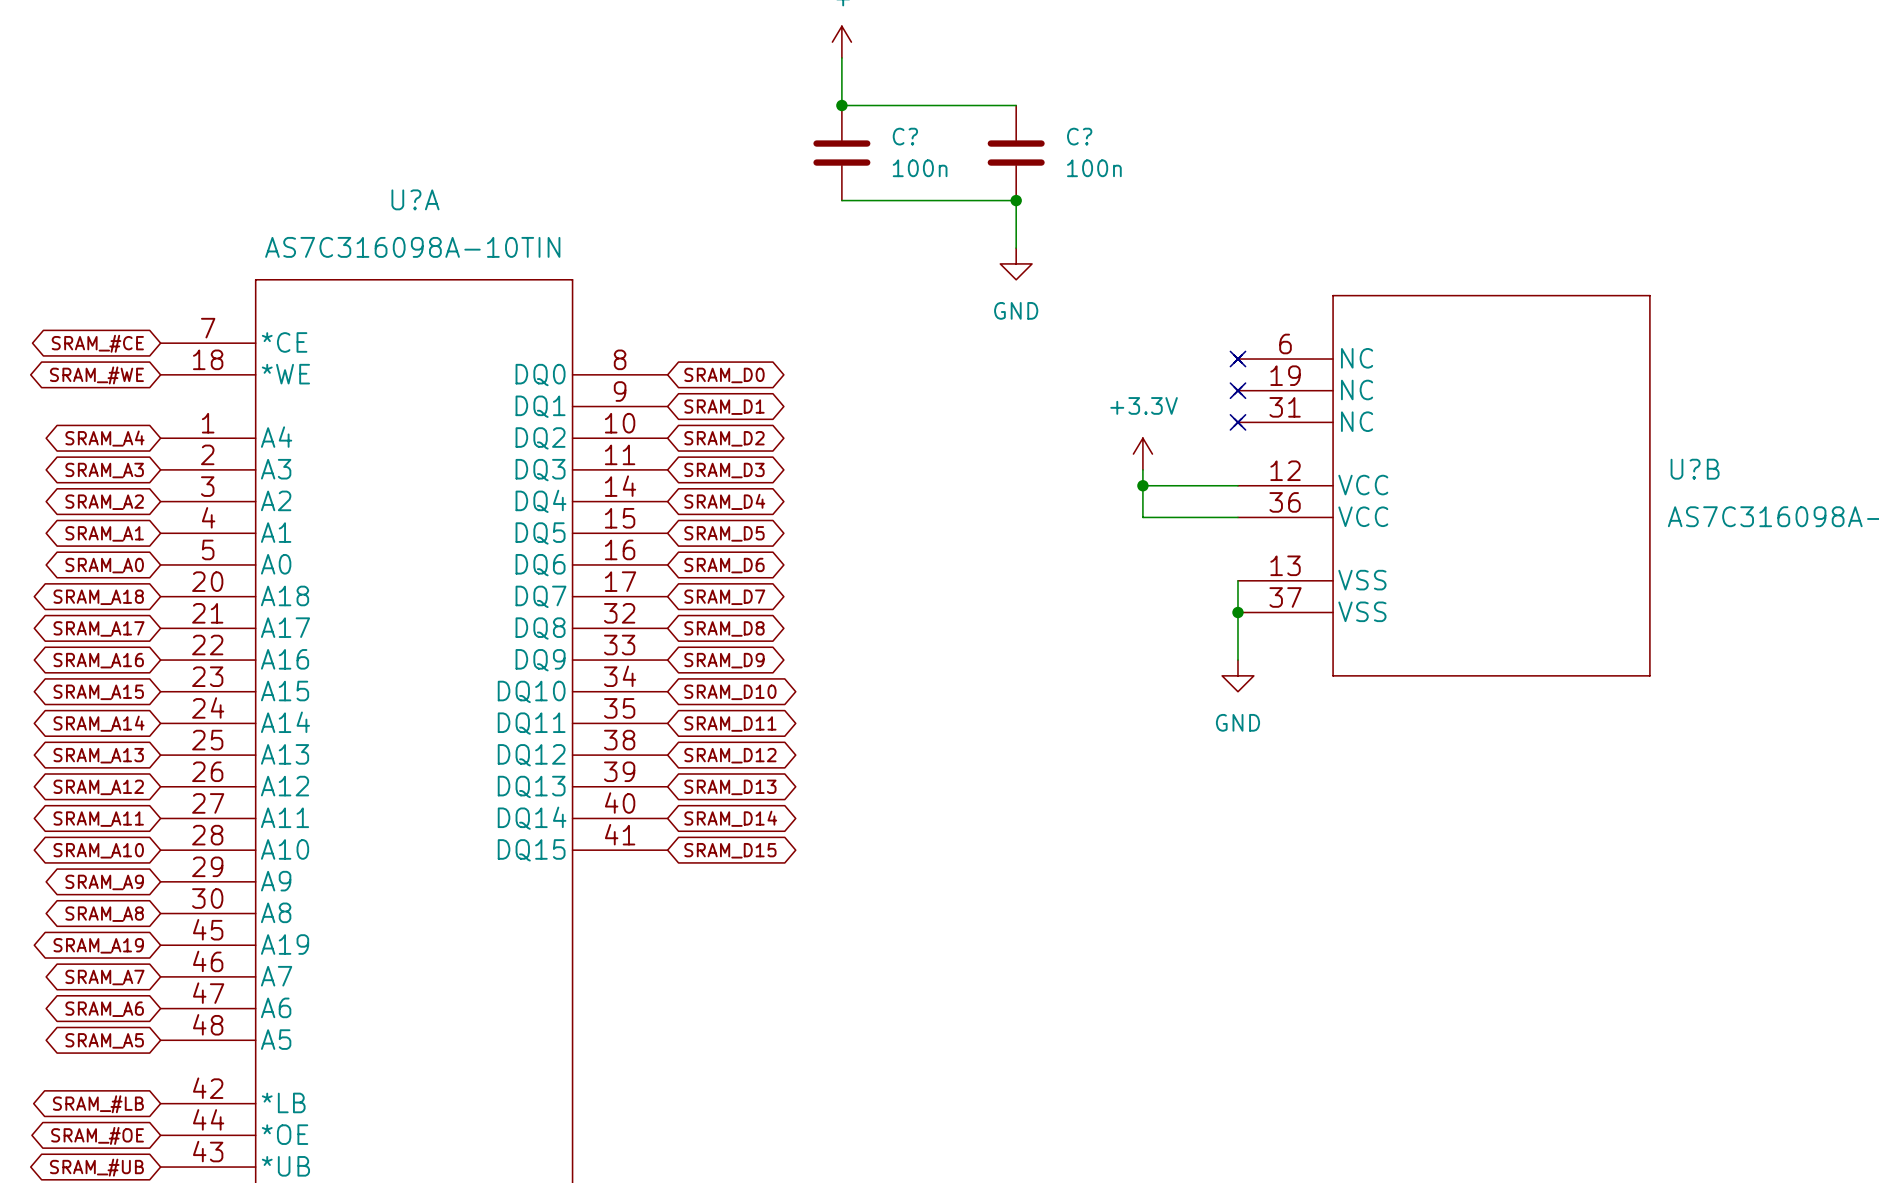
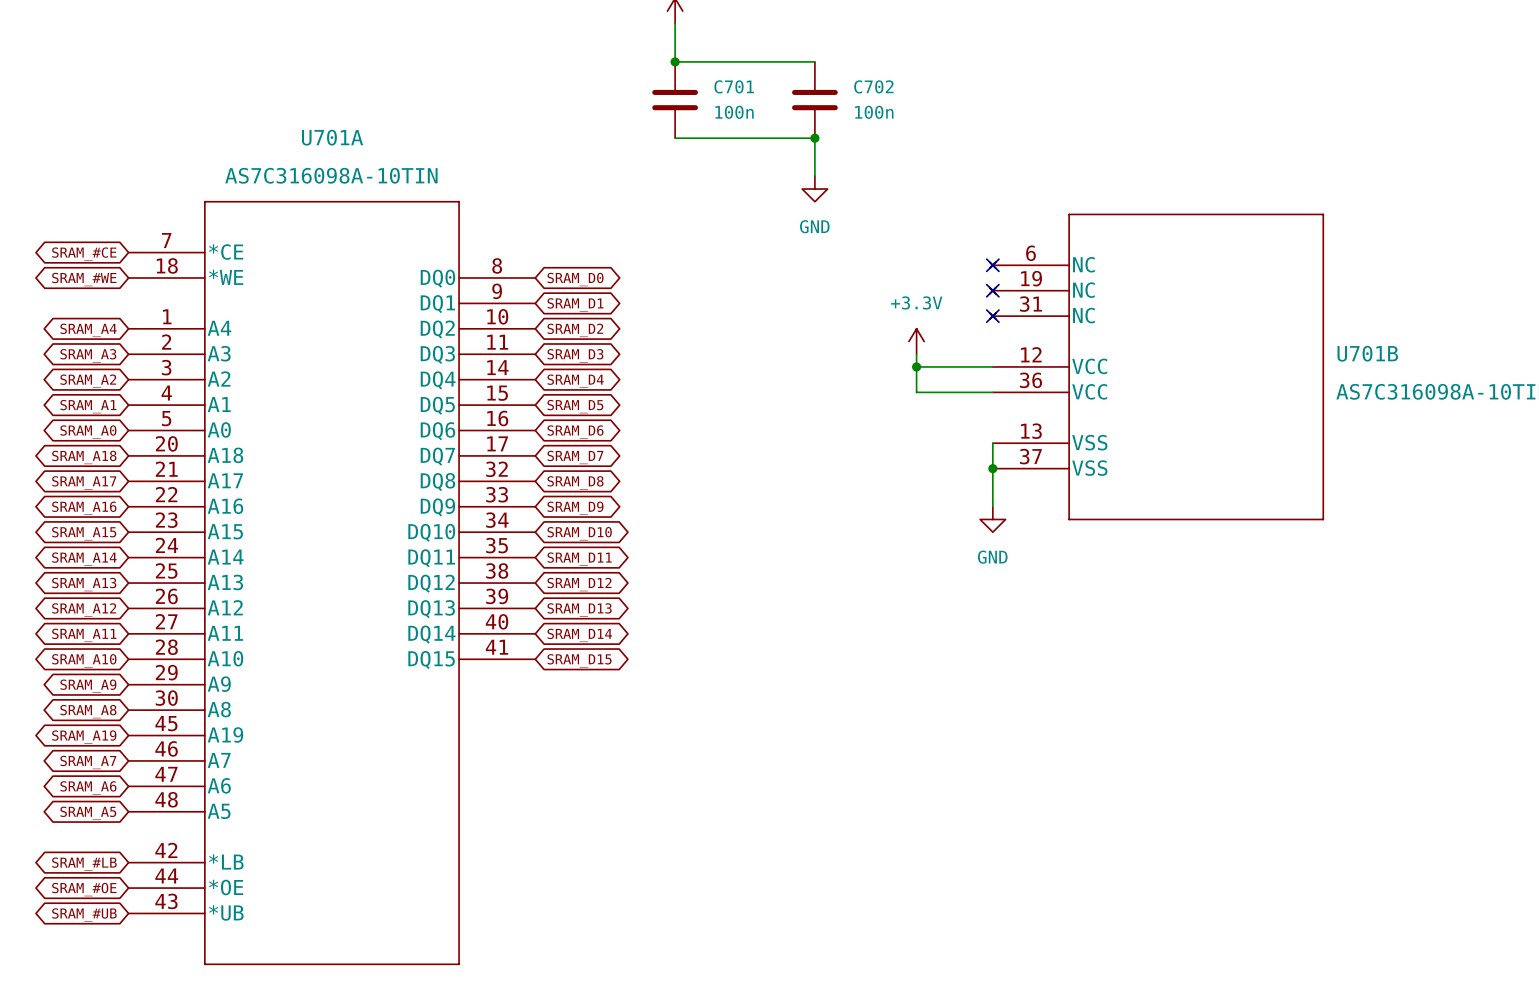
C? name: C? (905, 136) -> C701 (734, 86)
C? name: C? (1079, 136) -> C702 (873, 86)
U?A name: U?A (415, 199) -> U701A (332, 137)
U?B name: U?B (1695, 469) -> U701B (1367, 353)

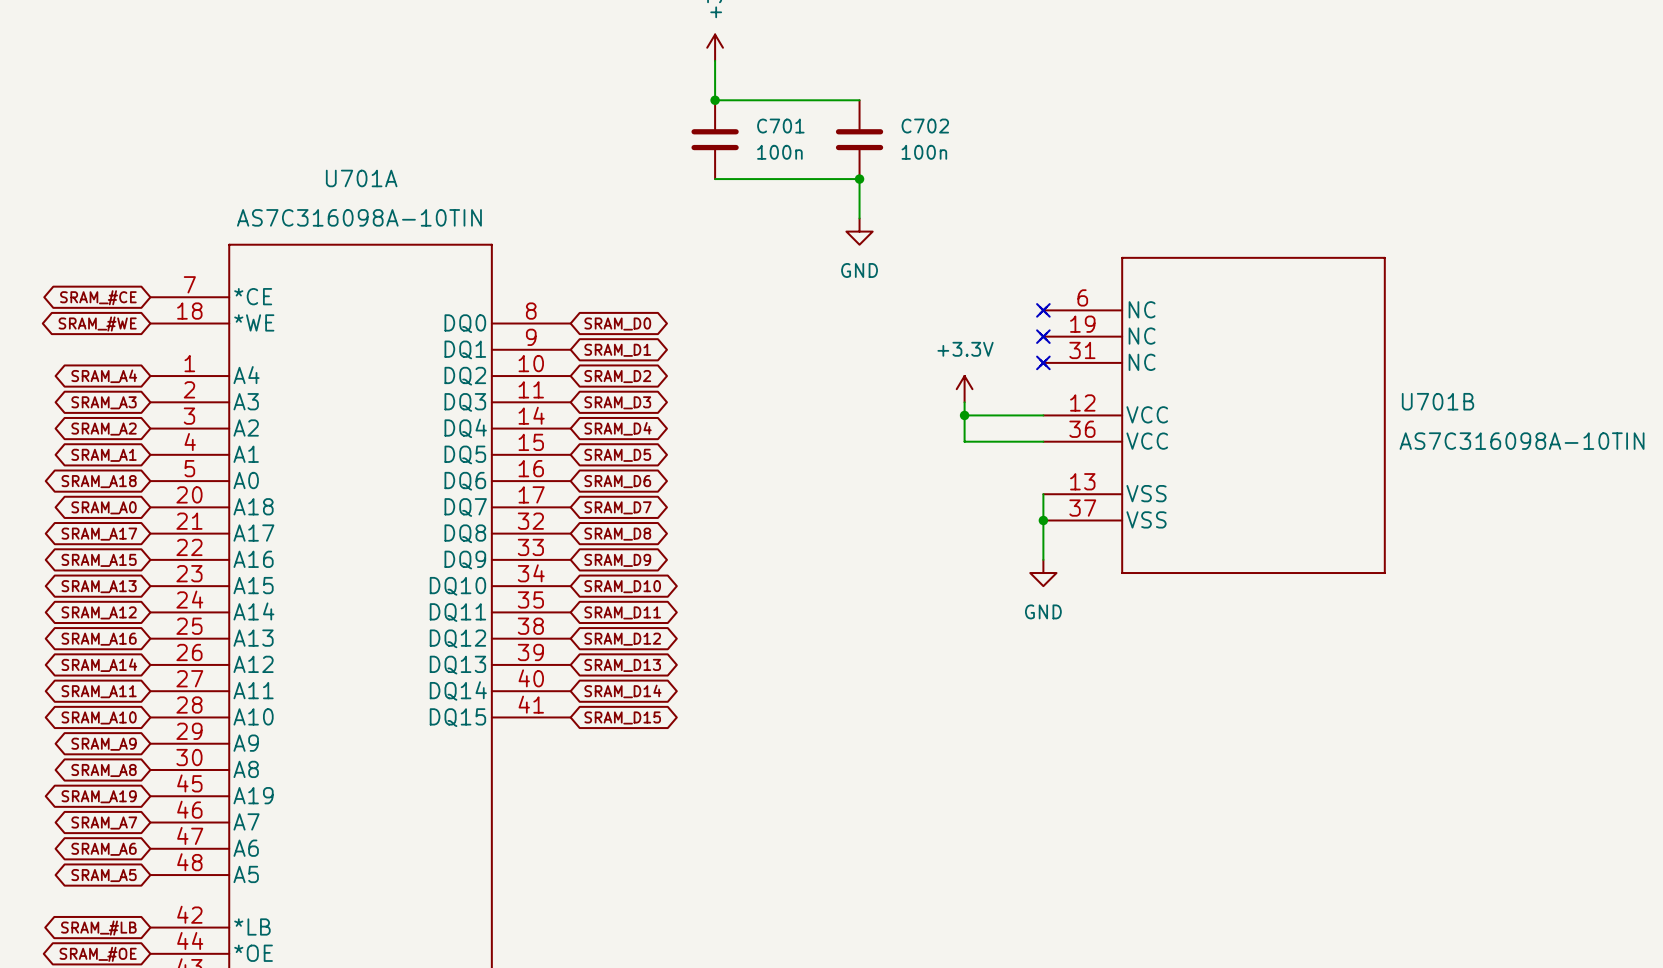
global label: SRAM_A0 (88, 432) -> SRAM_A18 (99, 481)
global label: SRAM_A18 (84, 457) -> SRAM_A0 (104, 507)
global label: SRAM_A16 (84, 508) -> SRAM_A15 (99, 560)
global label: SRAM_A15 (84, 533) -> SRAM_A13 (99, 586)
global label: SRAM_A14 (84, 559) -> SRAM_A12 (99, 612)
global label: SRAM_A13 (84, 584) -> SRAM_A16 (99, 639)
global label: SRAM_A12 (84, 609) -> SRAM_A14 (99, 665)

